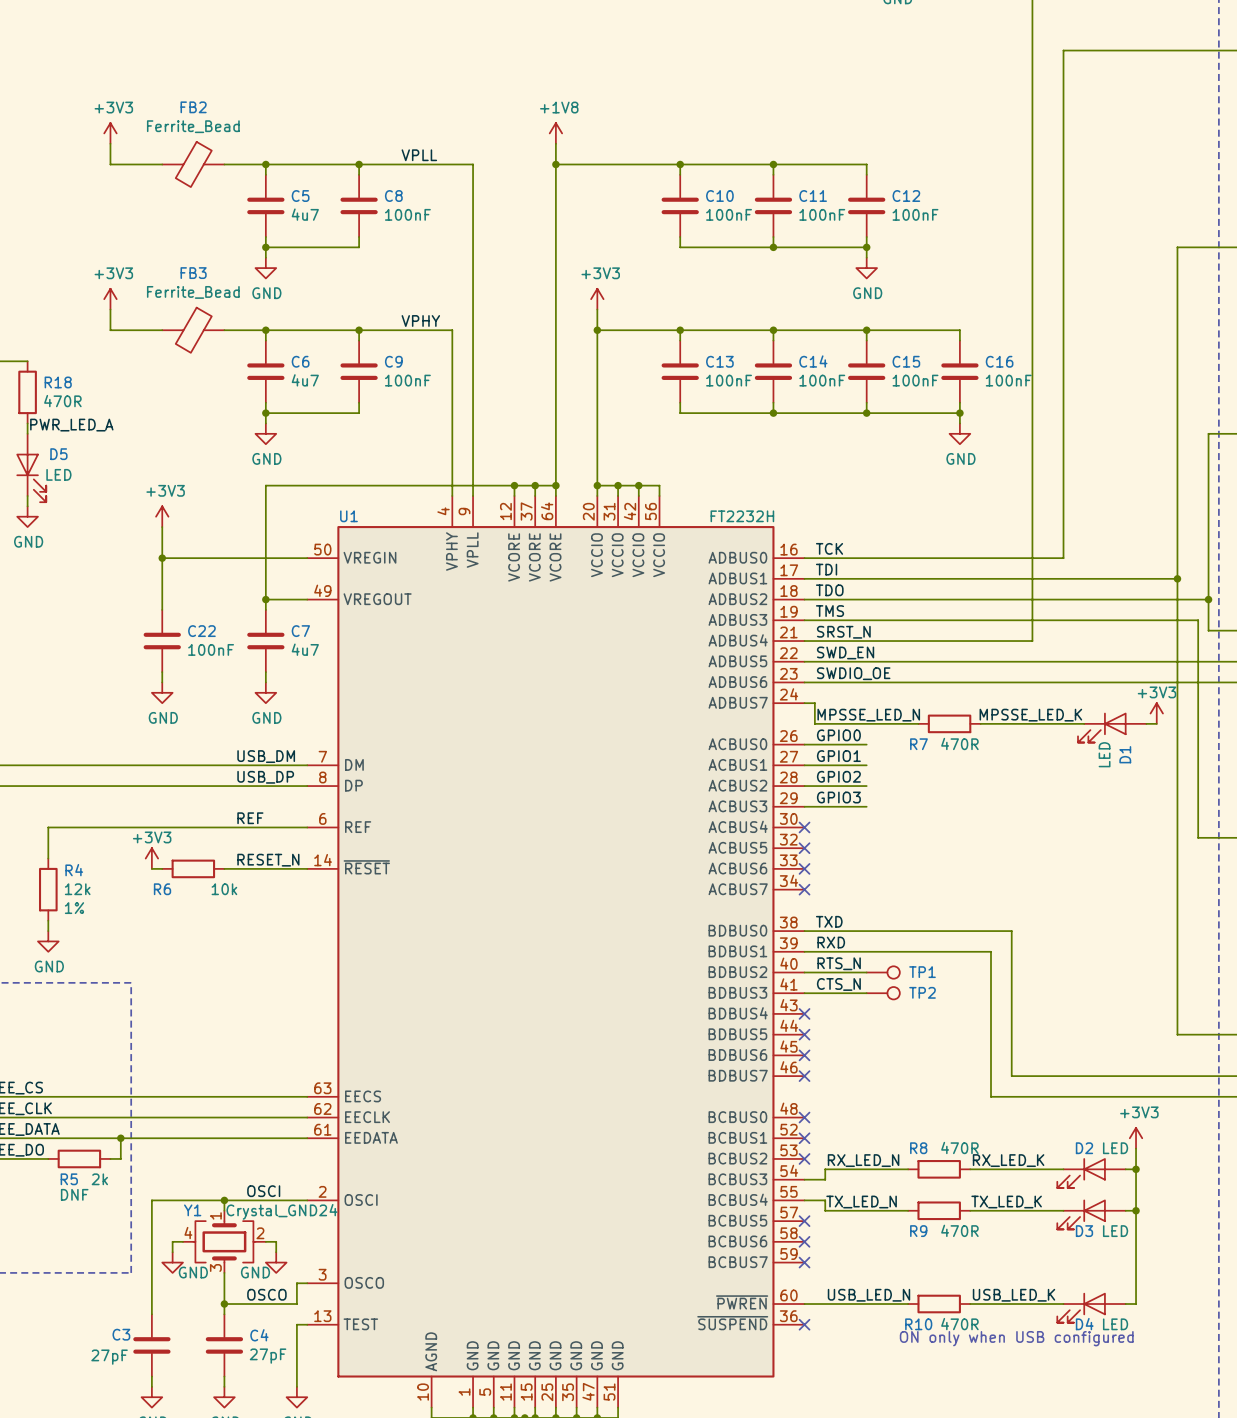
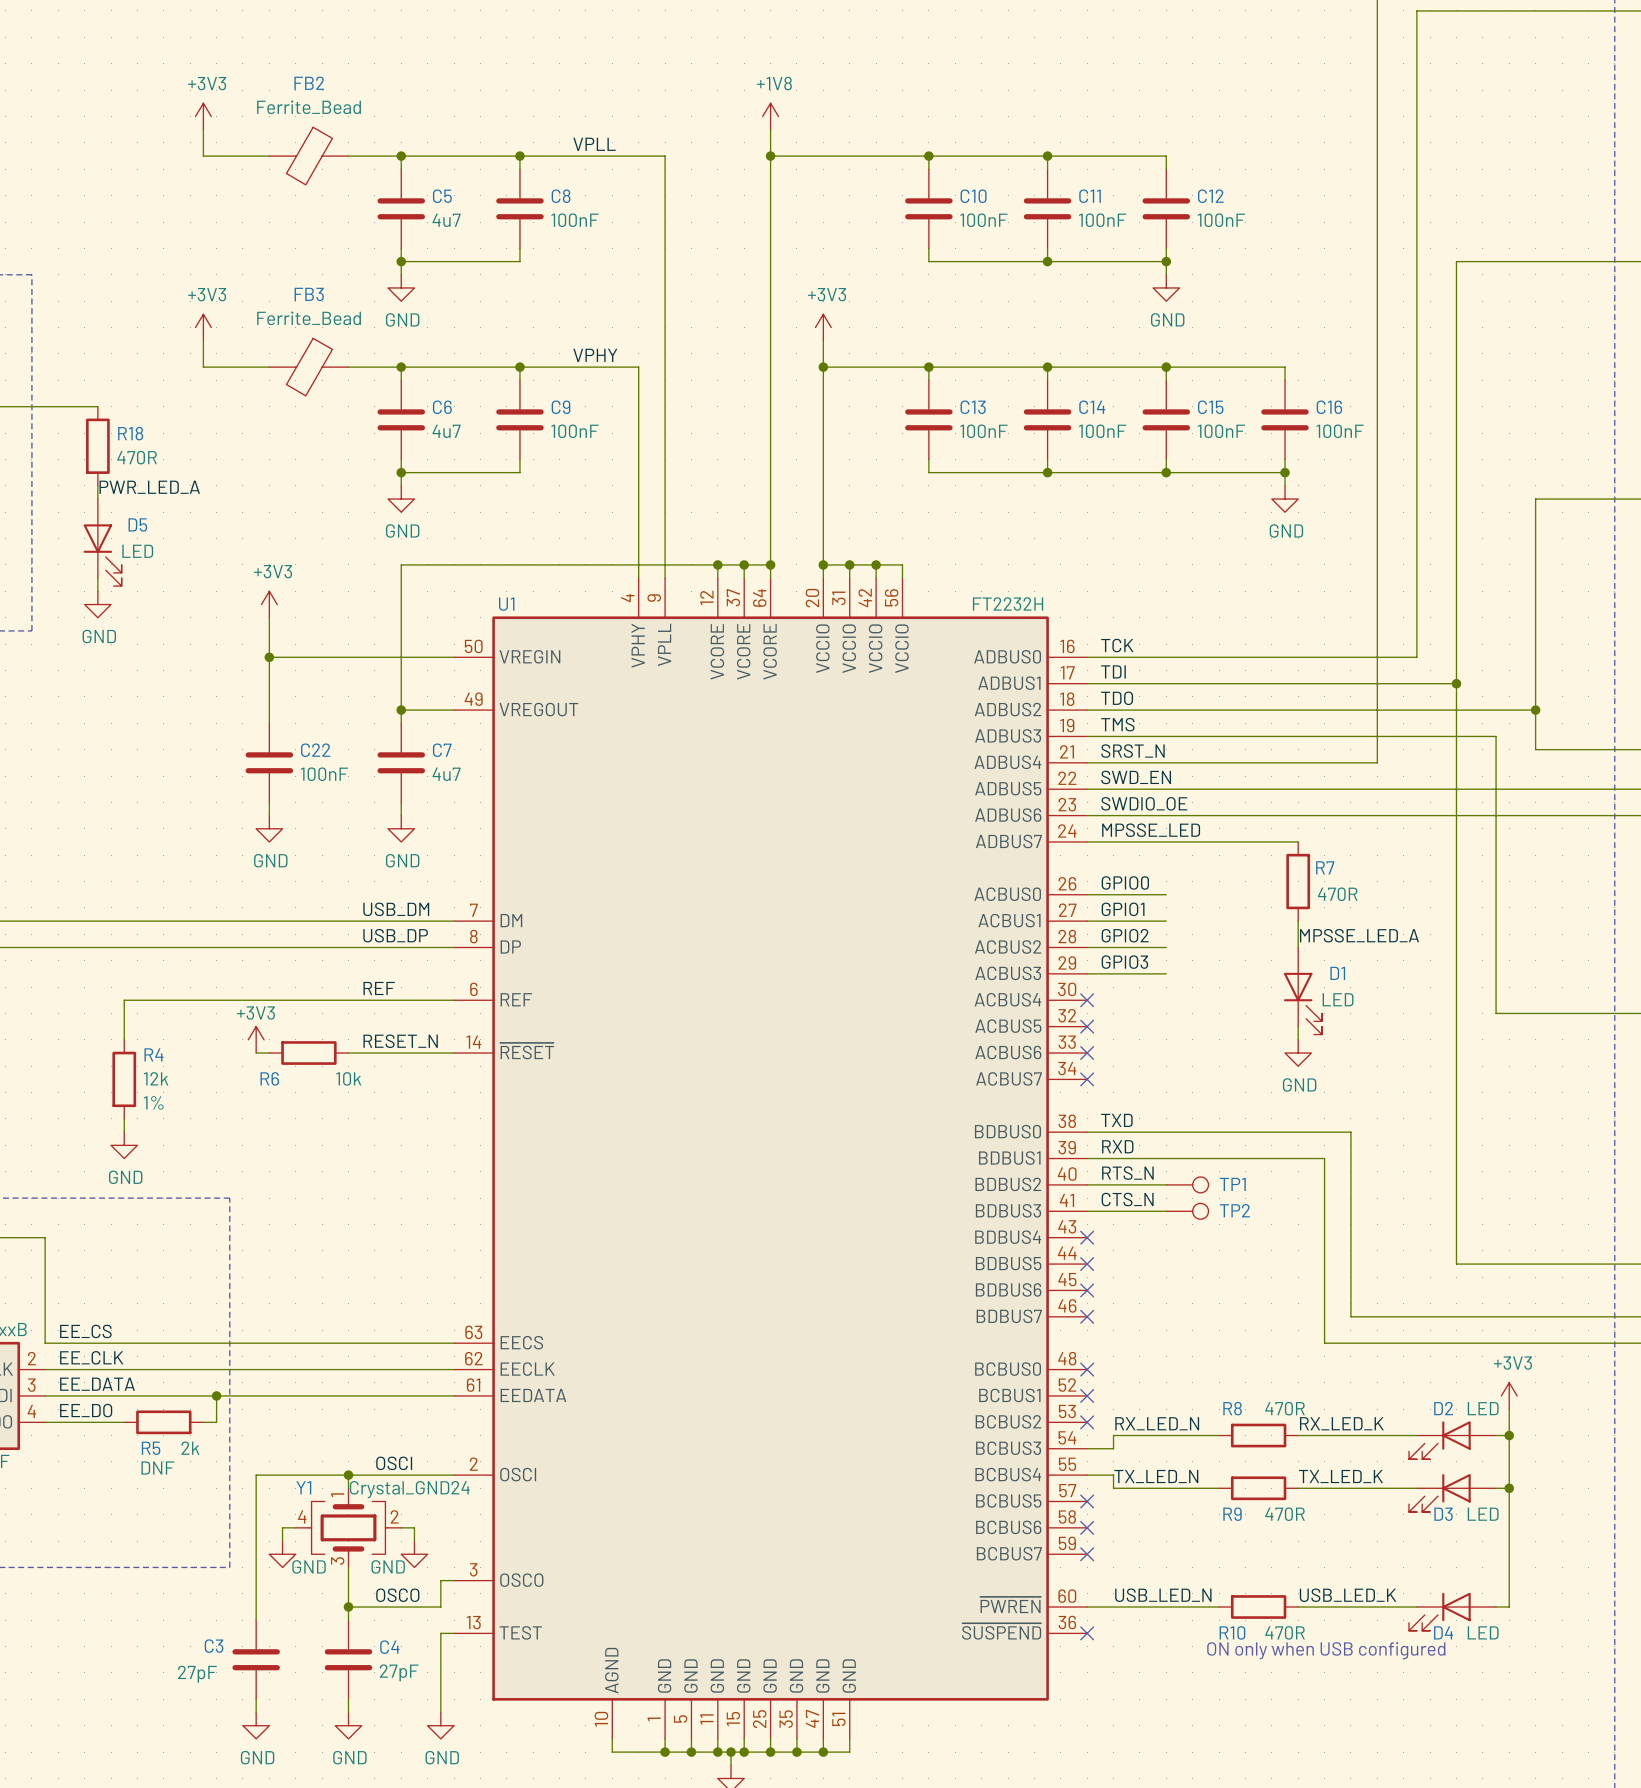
wire: (1177, 247) (1177, 1034) -> (1562, 261) (1456, 261) (1456, 1264) (1562, 1264)
wire: (1208, 433) (1208, 630) -> (1601, 499) (1535, 499) (1535, 749) (1601, 749)
wire: (1094, 578) (1177, 578) -> none
junction: none -> (1456, 683)
junction: (1177, 578) -> none
wire: (1156, 599) (1208, 599) -> none
junction: none -> (1535, 710)
junction: (1208, 599) -> none
wire: (1125, 620) (1198, 620) (1198, 837) -> (1496, 736) (1496, 1013) (1588, 1013)
wire: (814, 703) (814, 723) (918, 723) -> (1100, 841) (1298, 841)
power symbol: +3V3 (1156, 713) -> none
label: MPSSE_LED_N (868, 715) -> MPSSE_LED (1151, 830)
label: MPSSE_LED_K (1030, 715) -> none
R7 rotation: 0° (949, 723) -> 90° clockwise (1298, 881)
wire: (980, 723) (1084, 723) -> none
wire: (1146, 723) (1156, 723) -> none
D1 rotation: 0° (1102, 727) -> 90° counterclockwise (1302, 1003)
D1 position: (1112, 727) -> (1302, 991)
R7 value position: 470R (959, 743) -> 470R (1337, 894)
R7 name position: R7 (918, 744) -> R7 (1325, 867)
wire: none -> (1298, 921) (1298, 947)
label: none -> MPSSE_LED_A (1359, 935)
wire: none -> (1298, 1026) (1298, 1039)
power symbol: none -> GND (1298, 1053)

